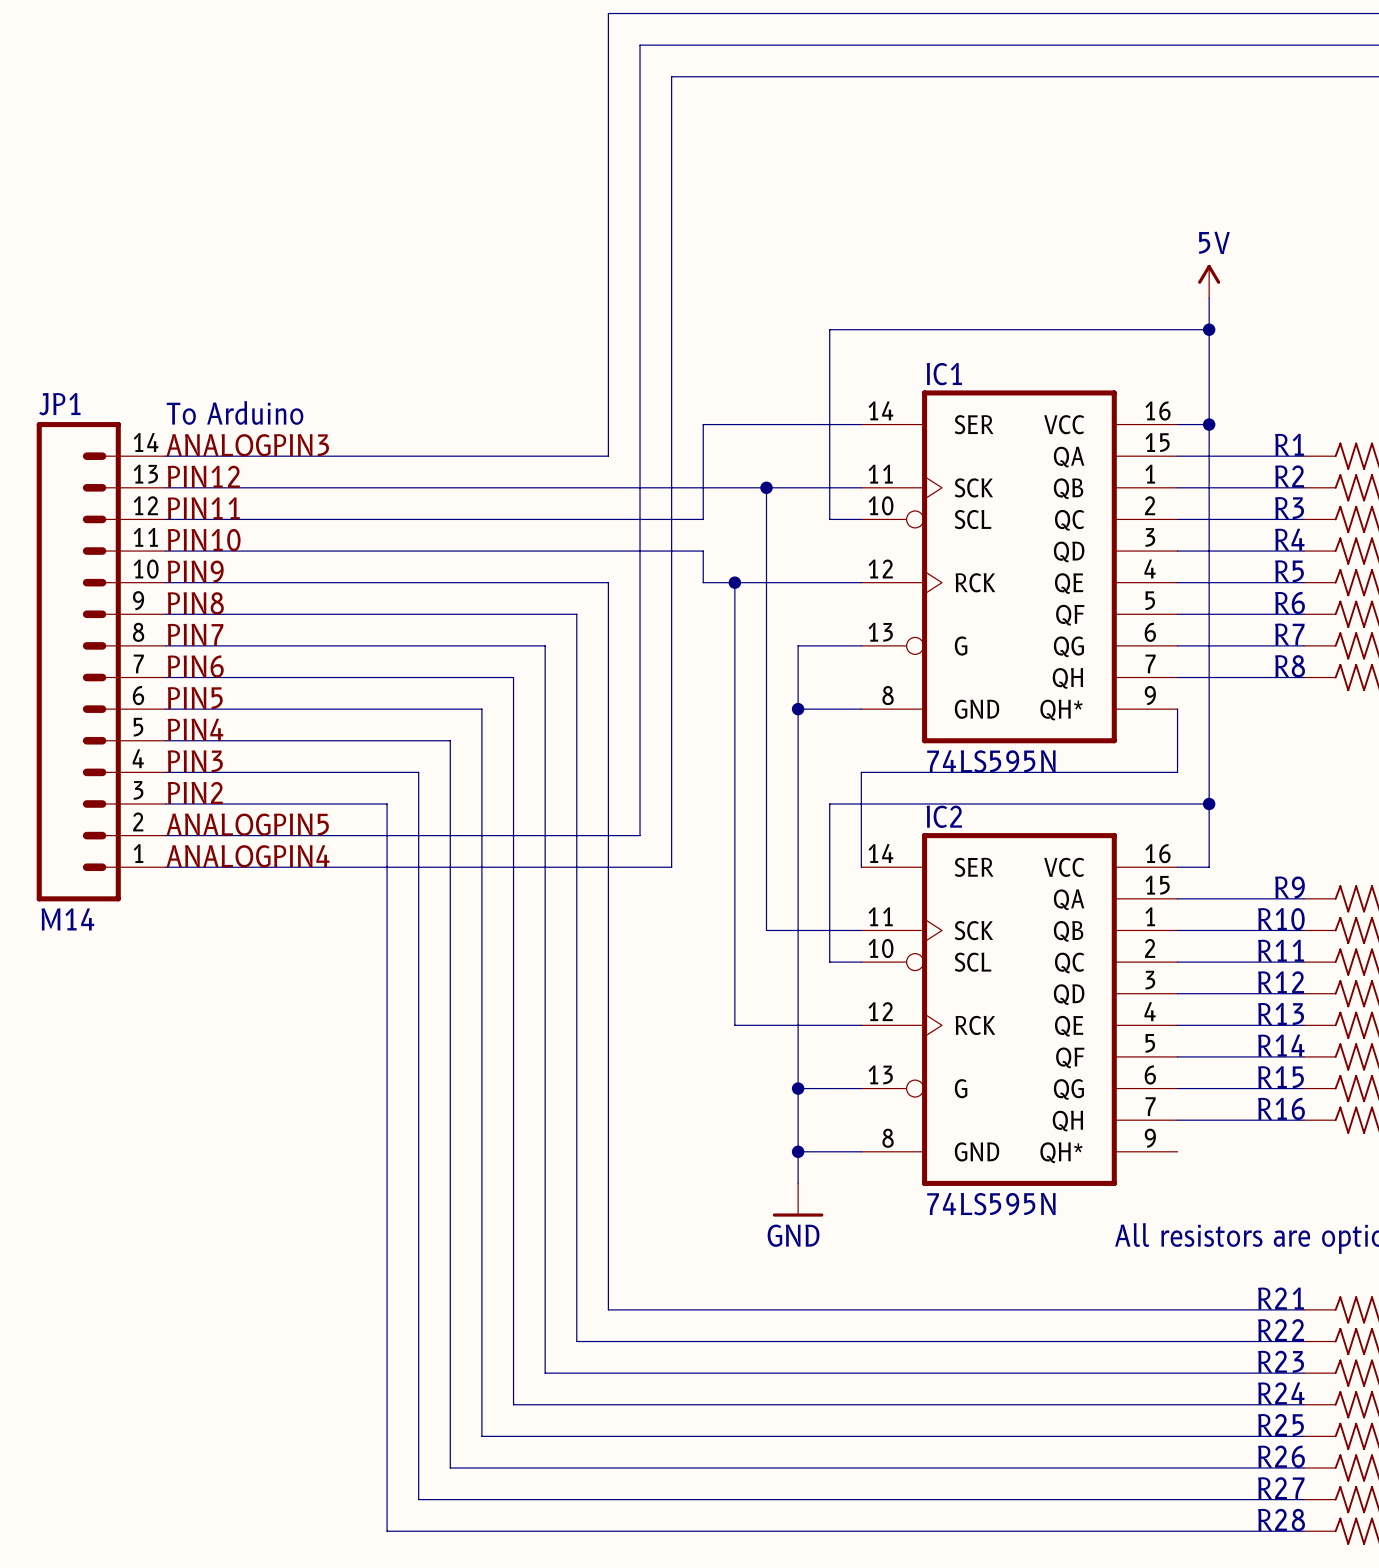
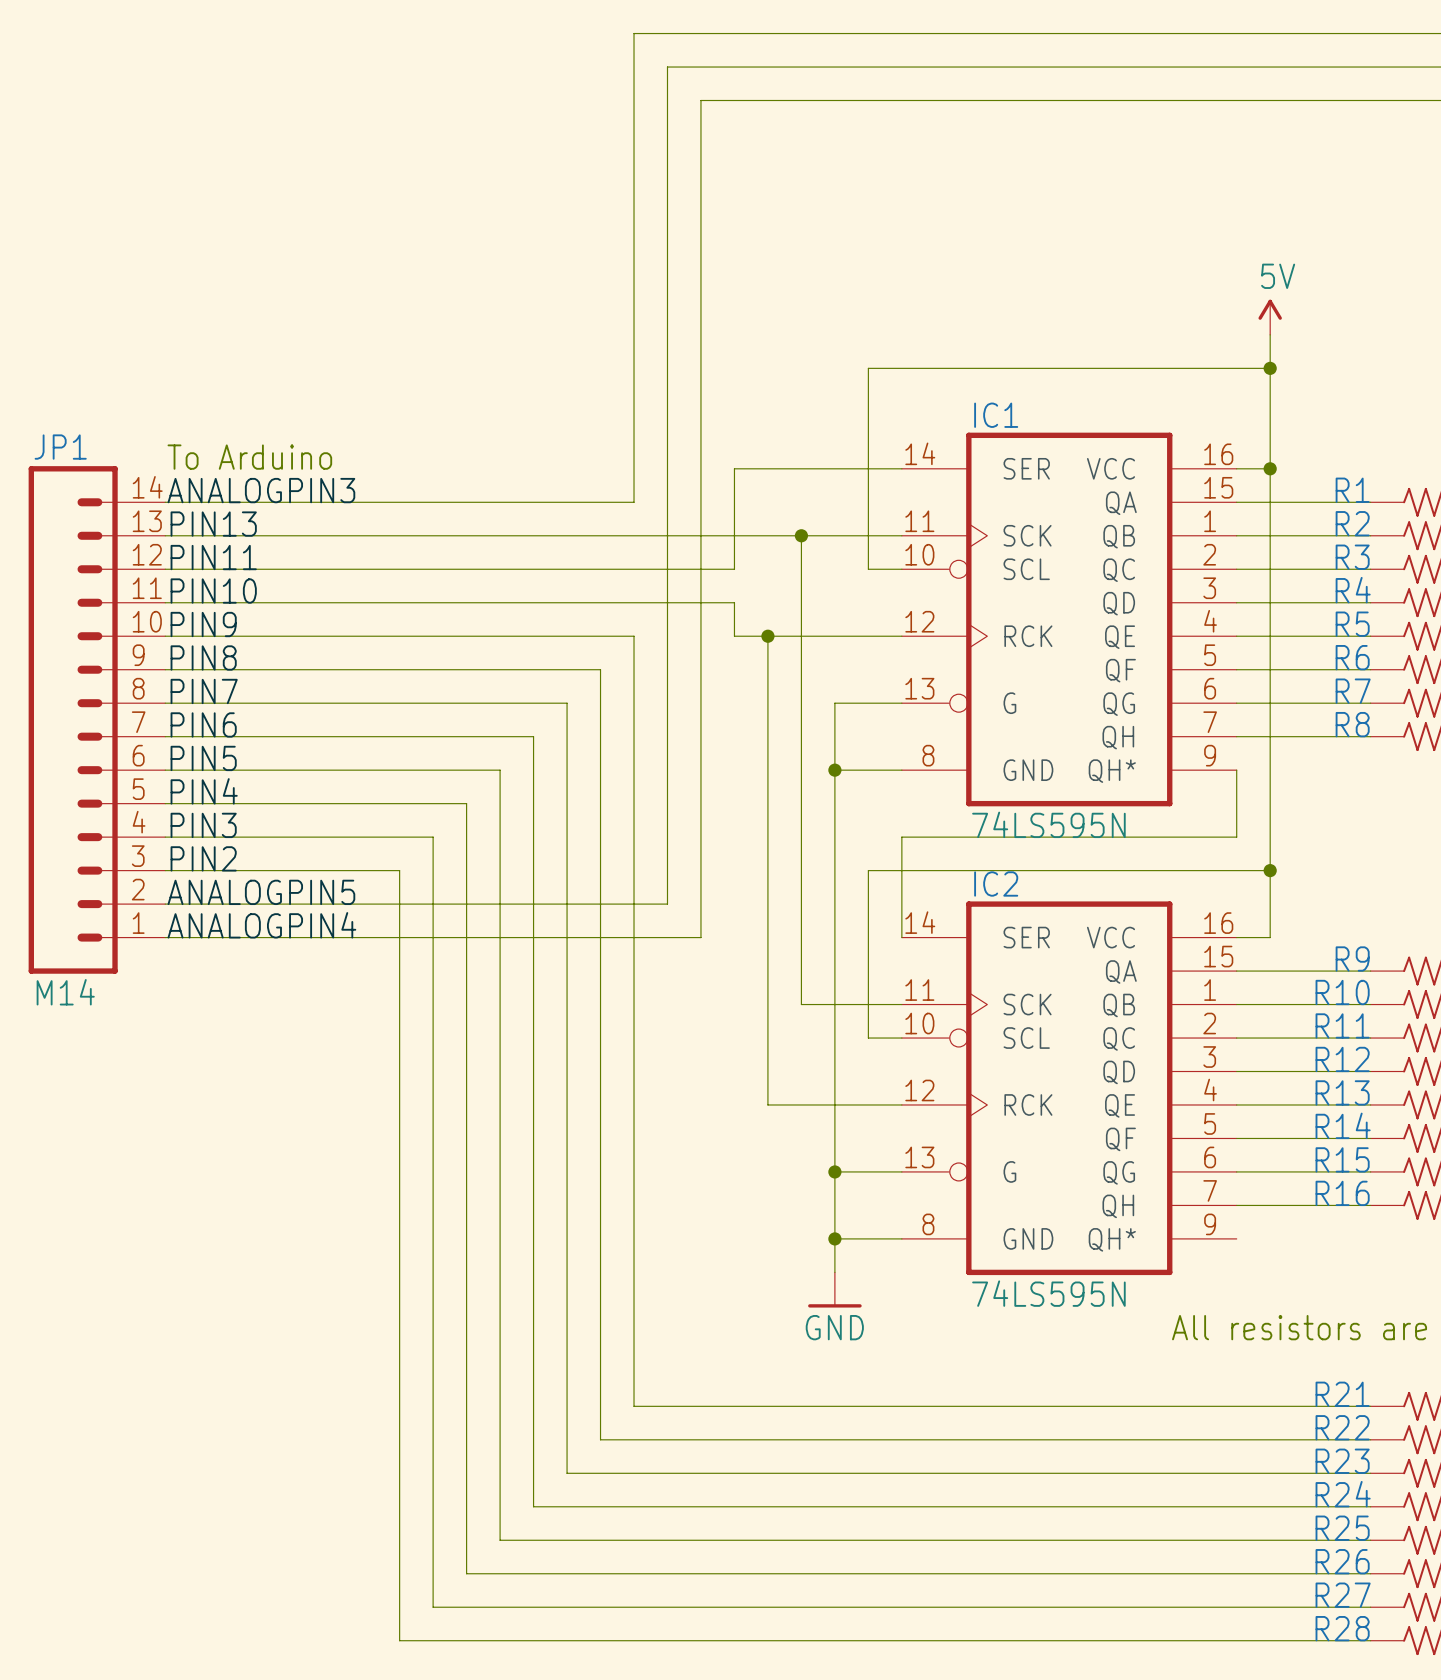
label: PIN12 (203, 476) -> PIN13 (213, 524)

